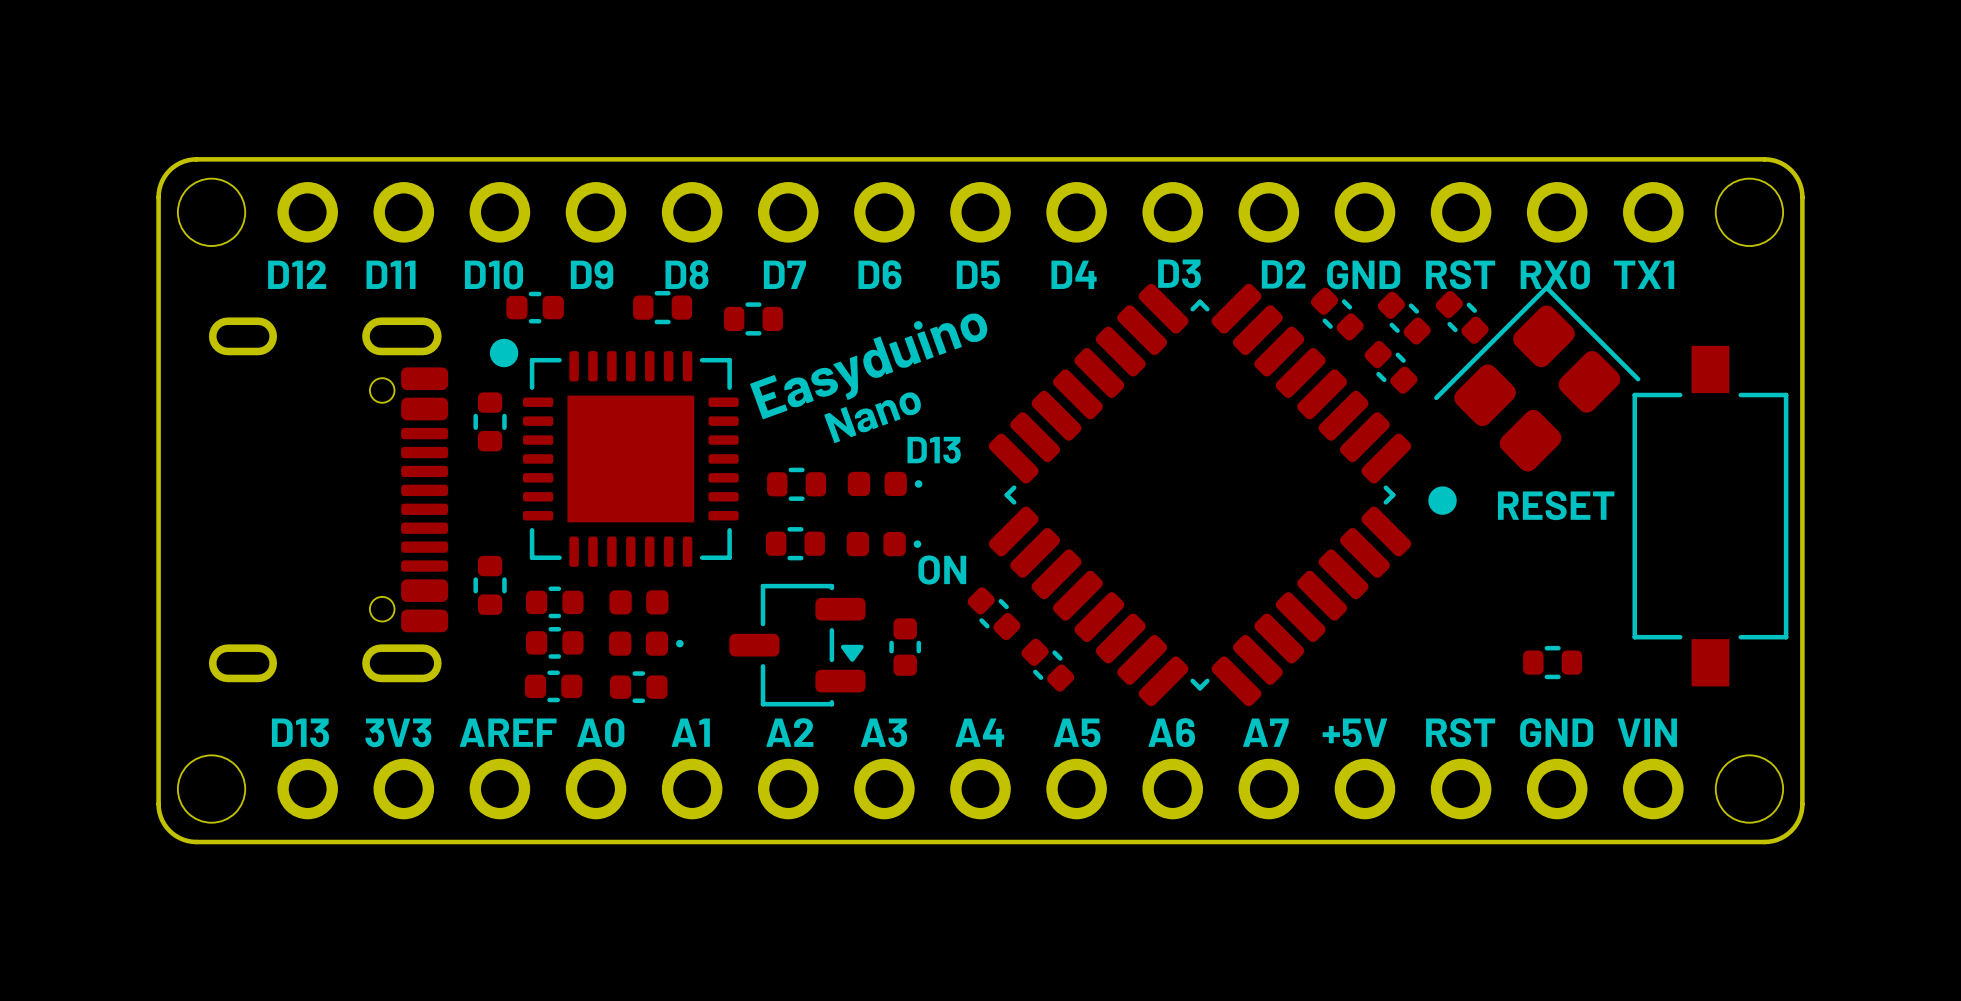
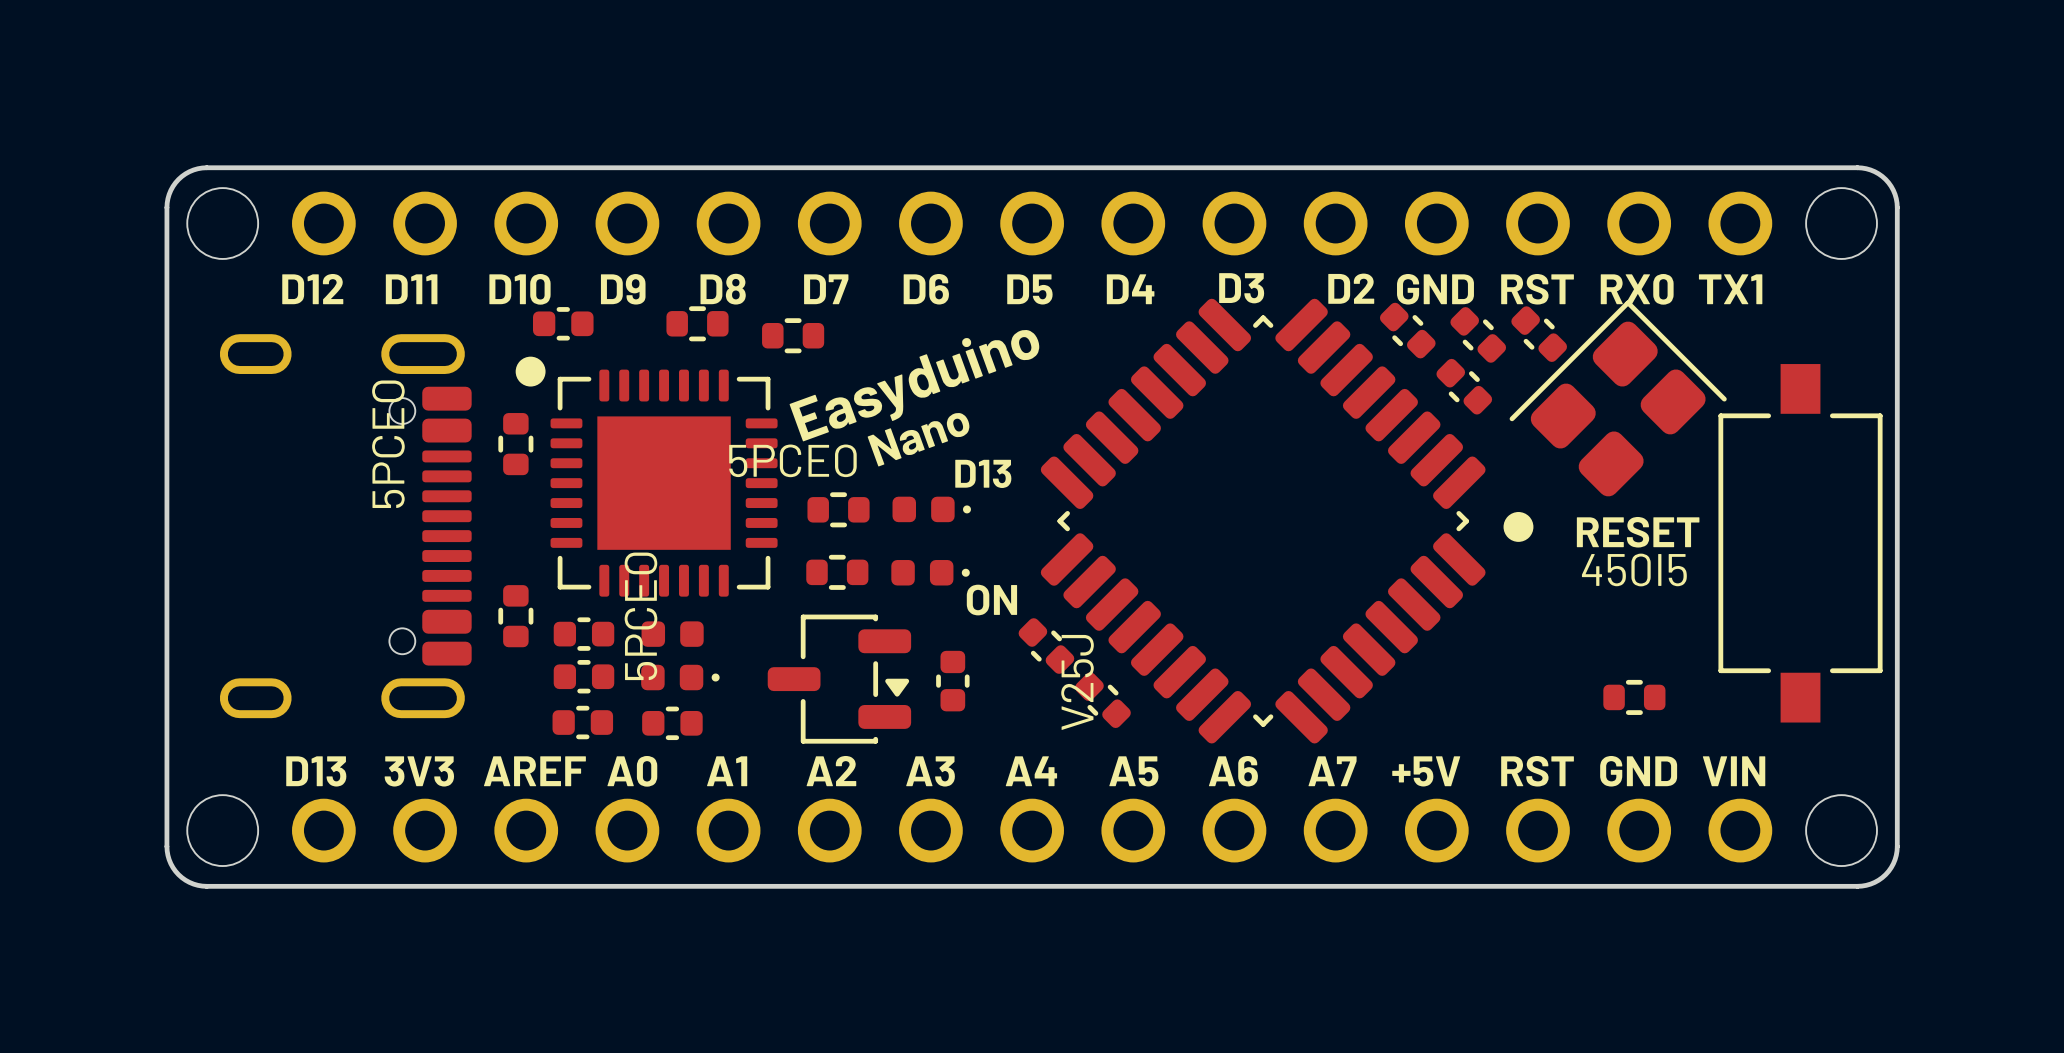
part text: none -> 5PCEO (388, 444)
part text: none -> 5PCEO (792, 460)
part text: none -> 450I5 (1634, 569)
part text: none -> 5PCEO (640, 616)
part text: none -> V25J (1077, 682)

